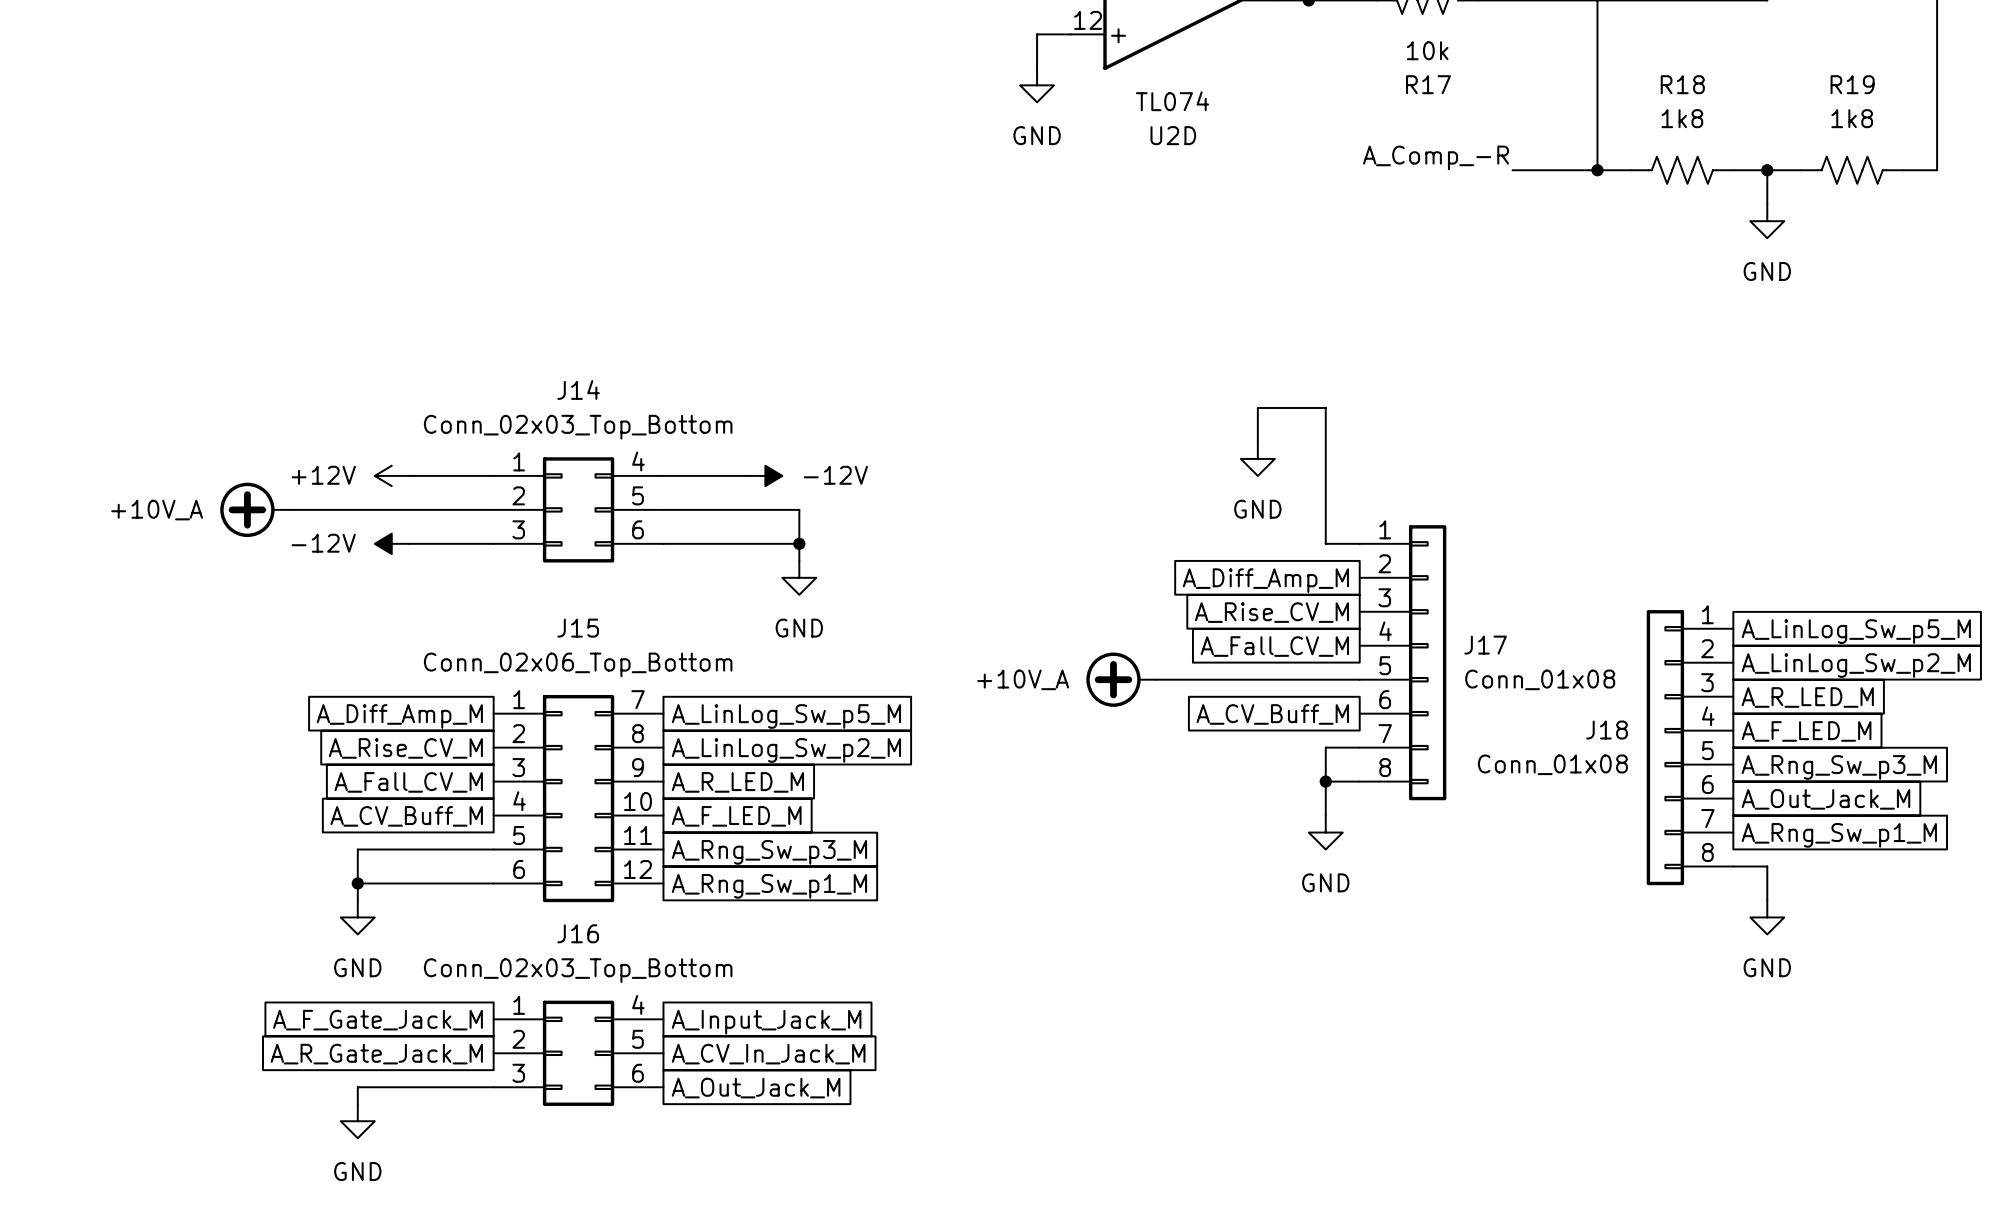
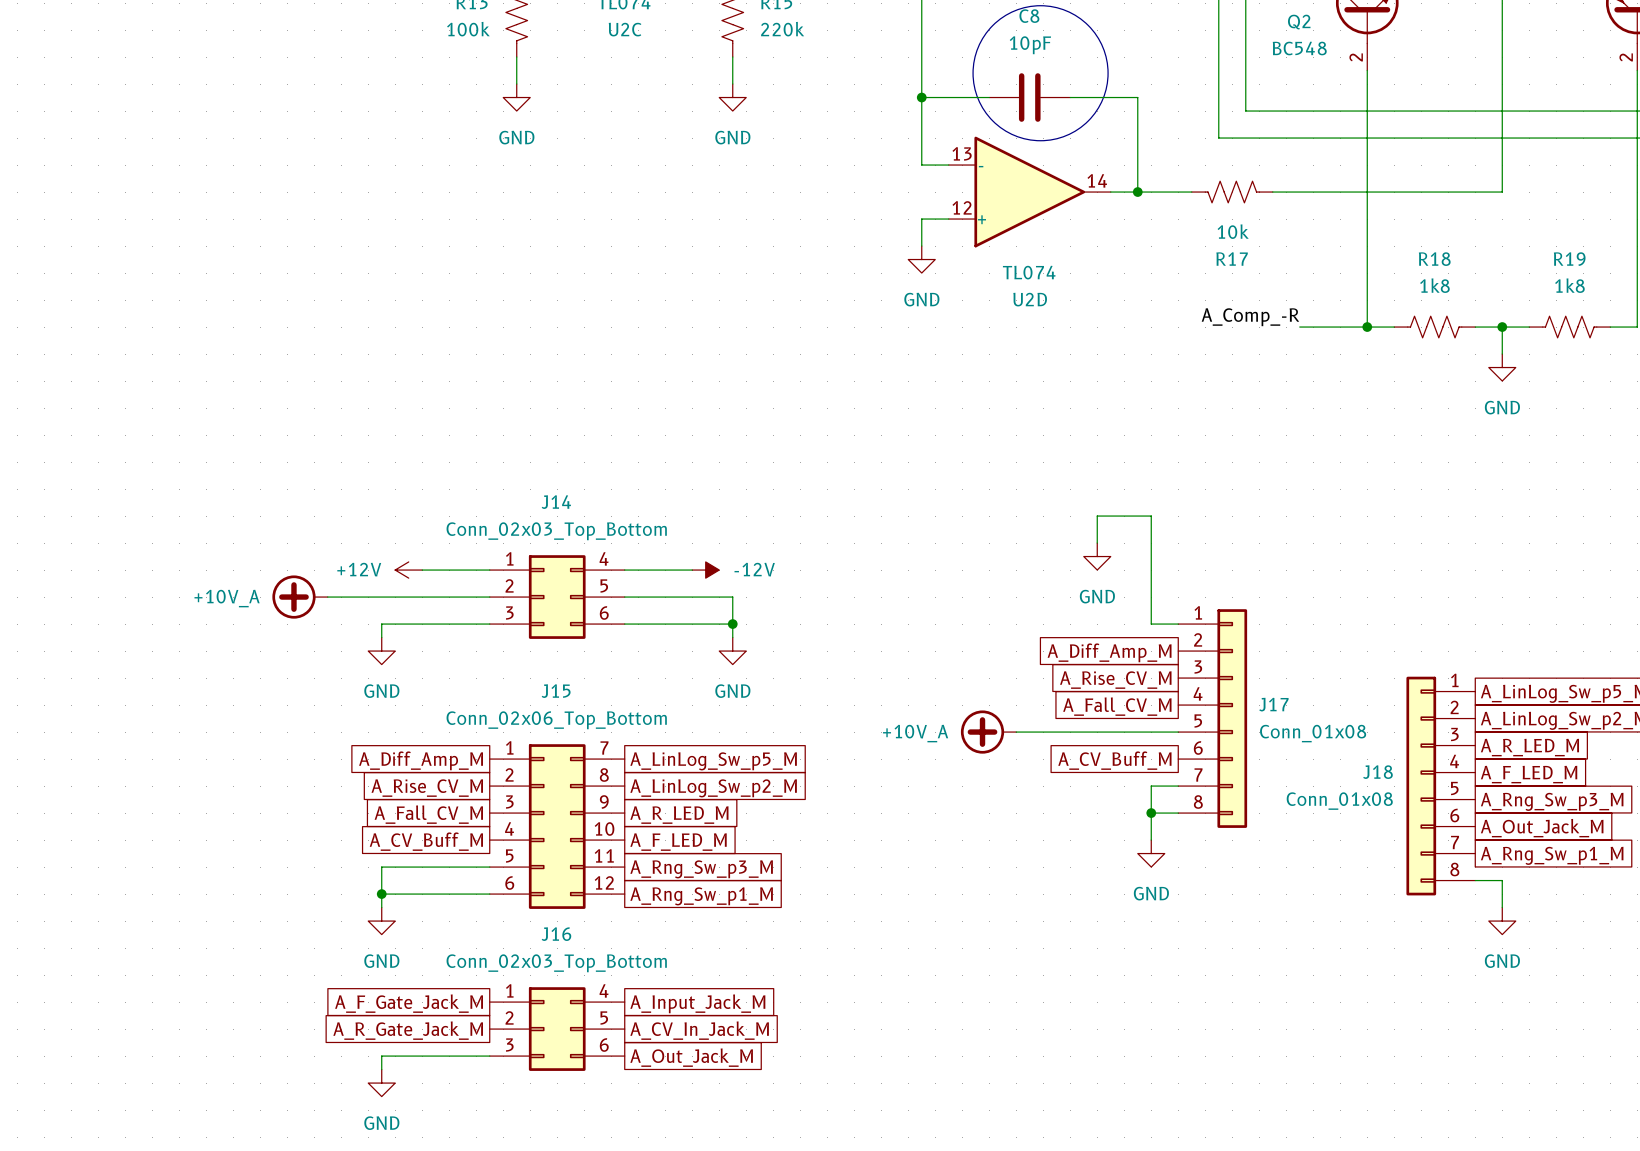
power symbol: -12V (391, 543) -> none
wire: none -> (422, 624) (381, 624) (381, 637)
power symbol: none -> GND (381, 651)

